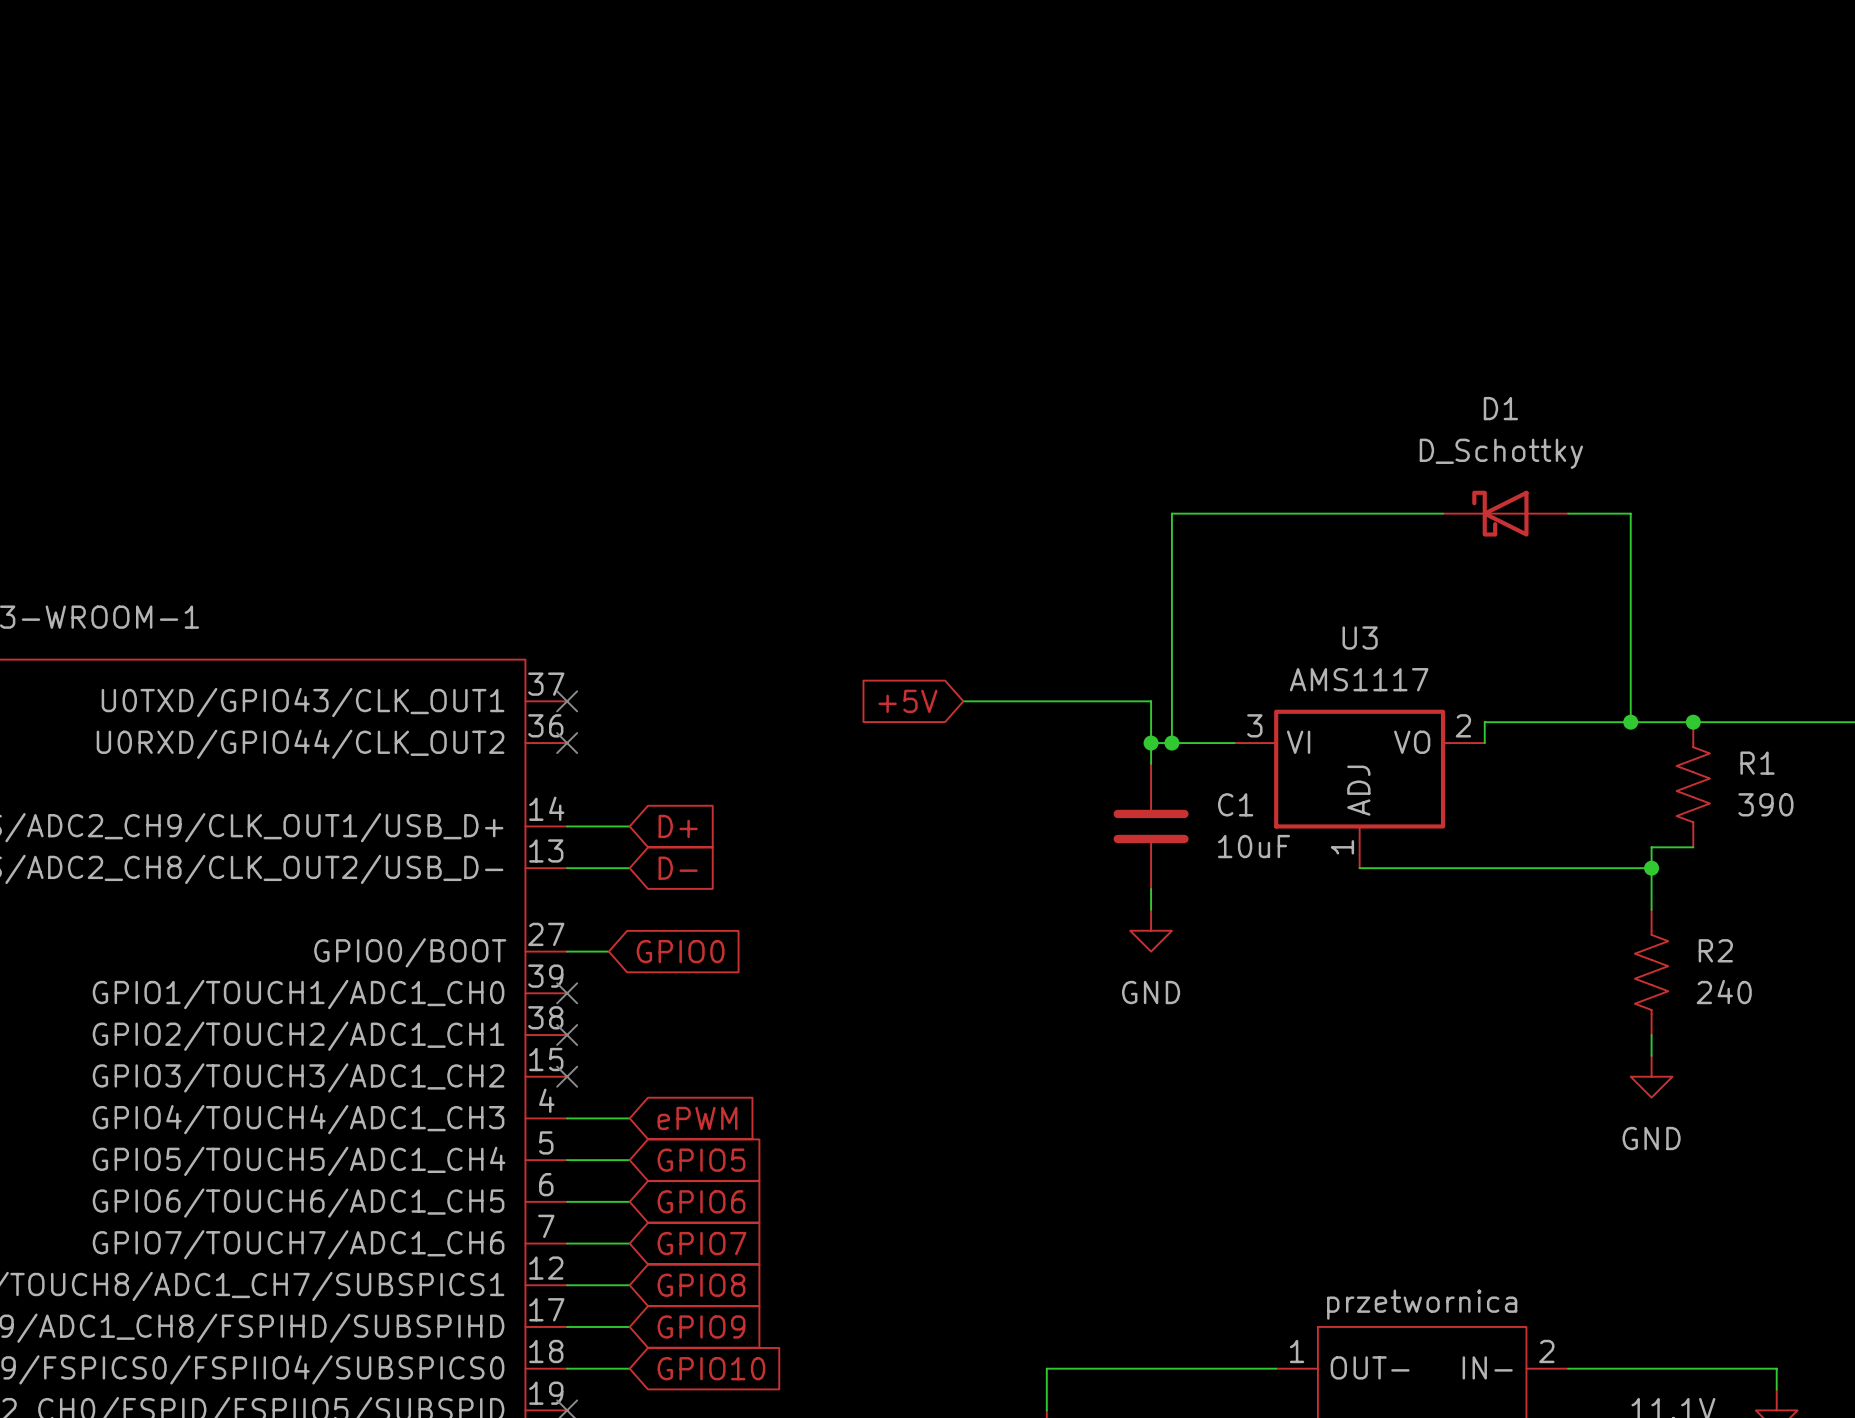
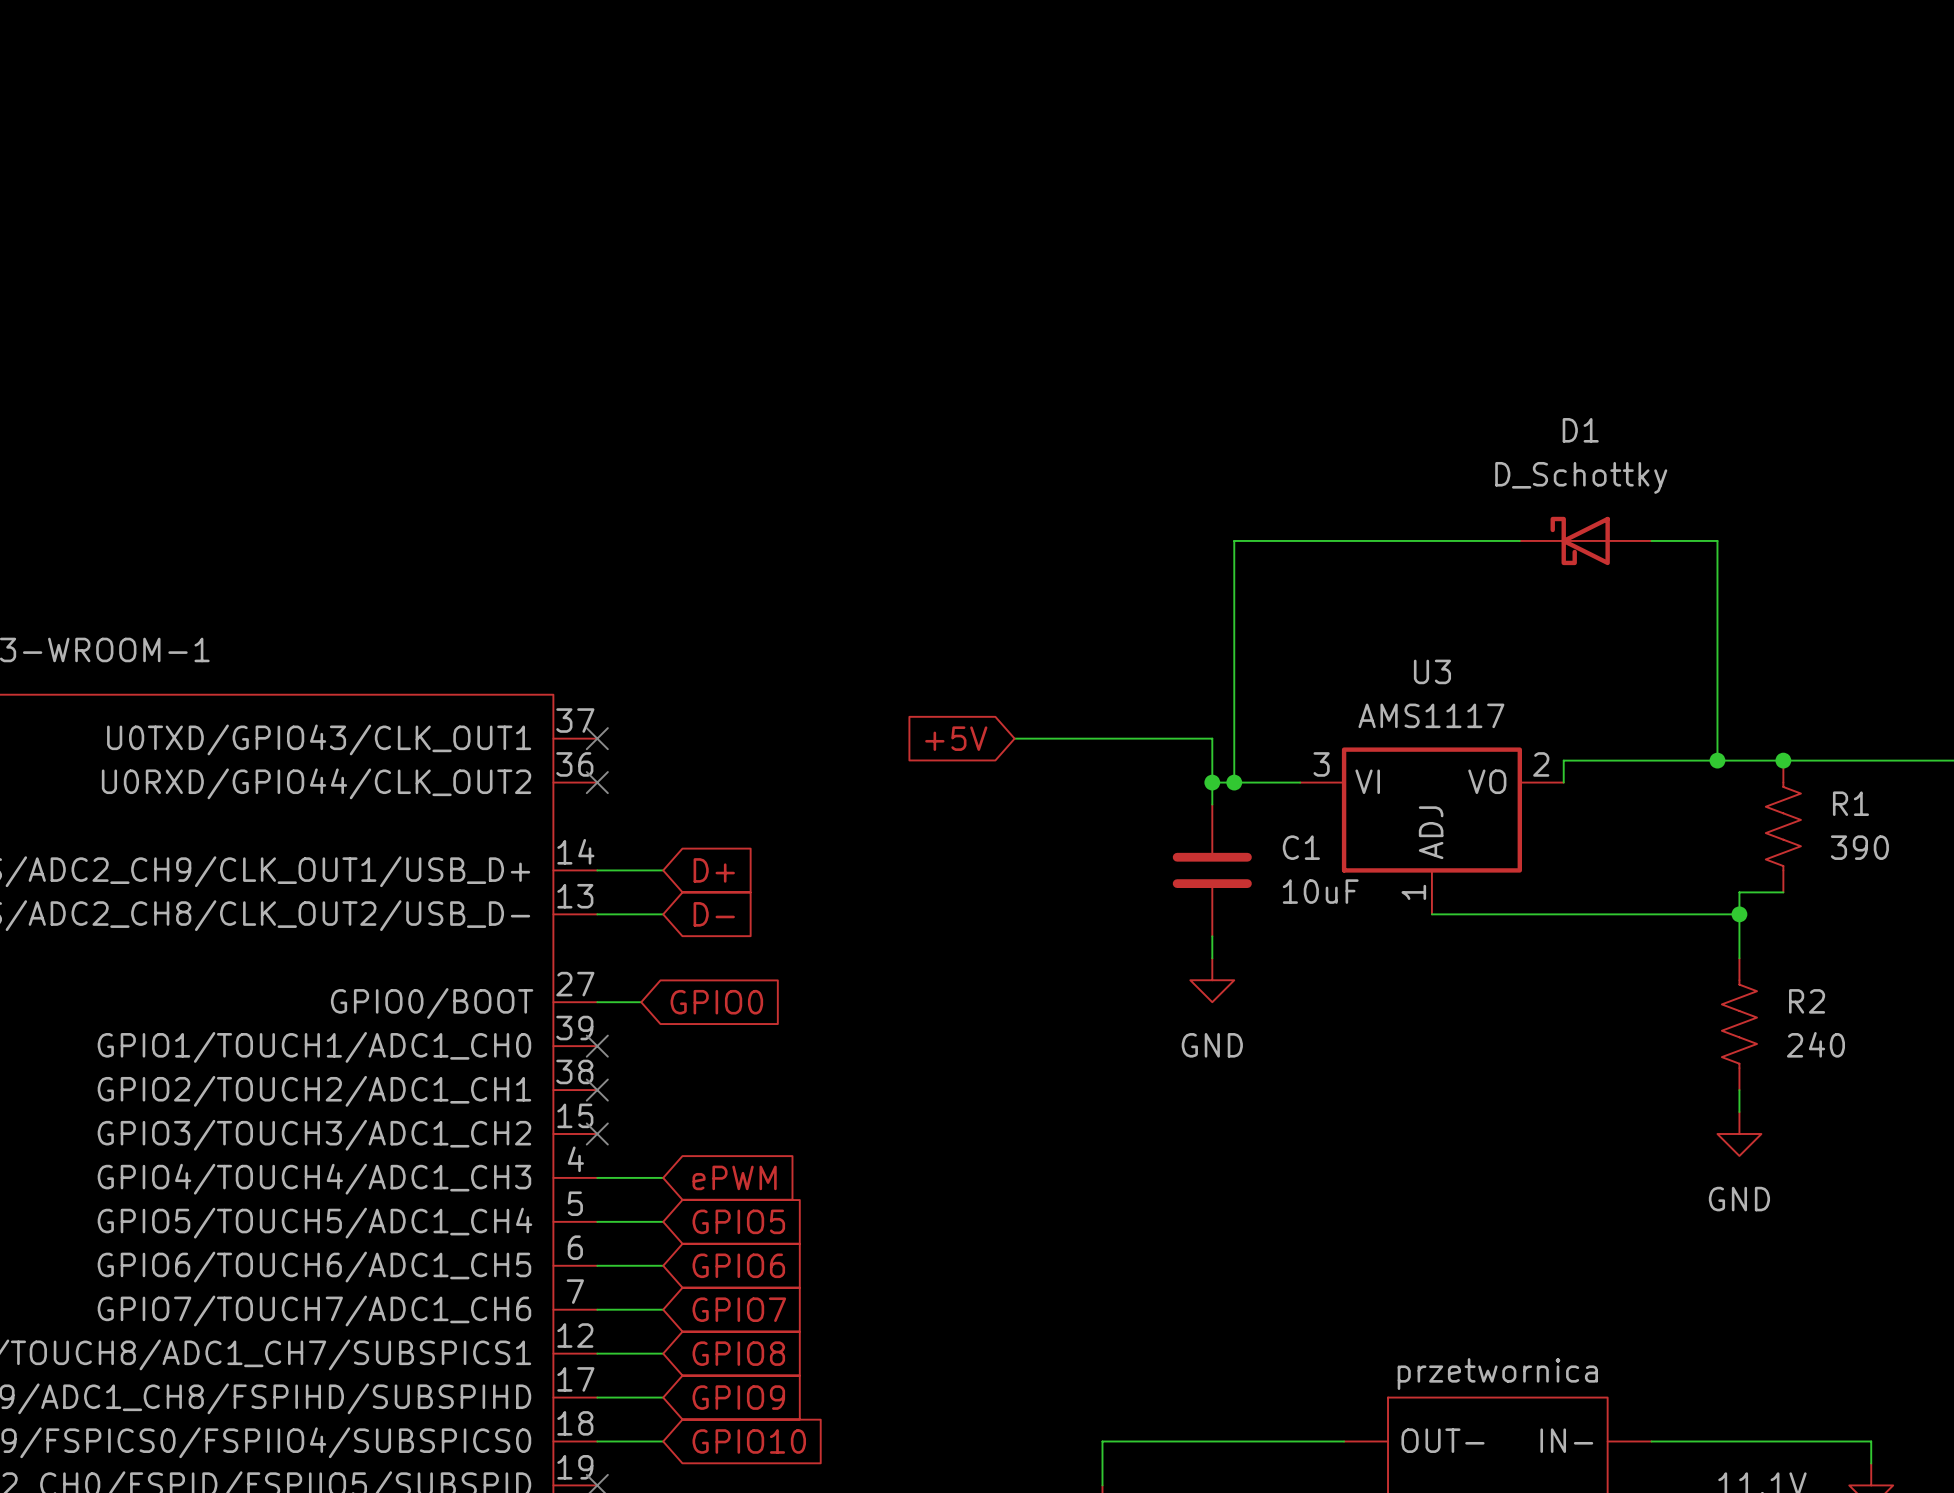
part pin number: 1 (1297, 1351) -> none
part pin number: 2 (1546, 1351) -> none

